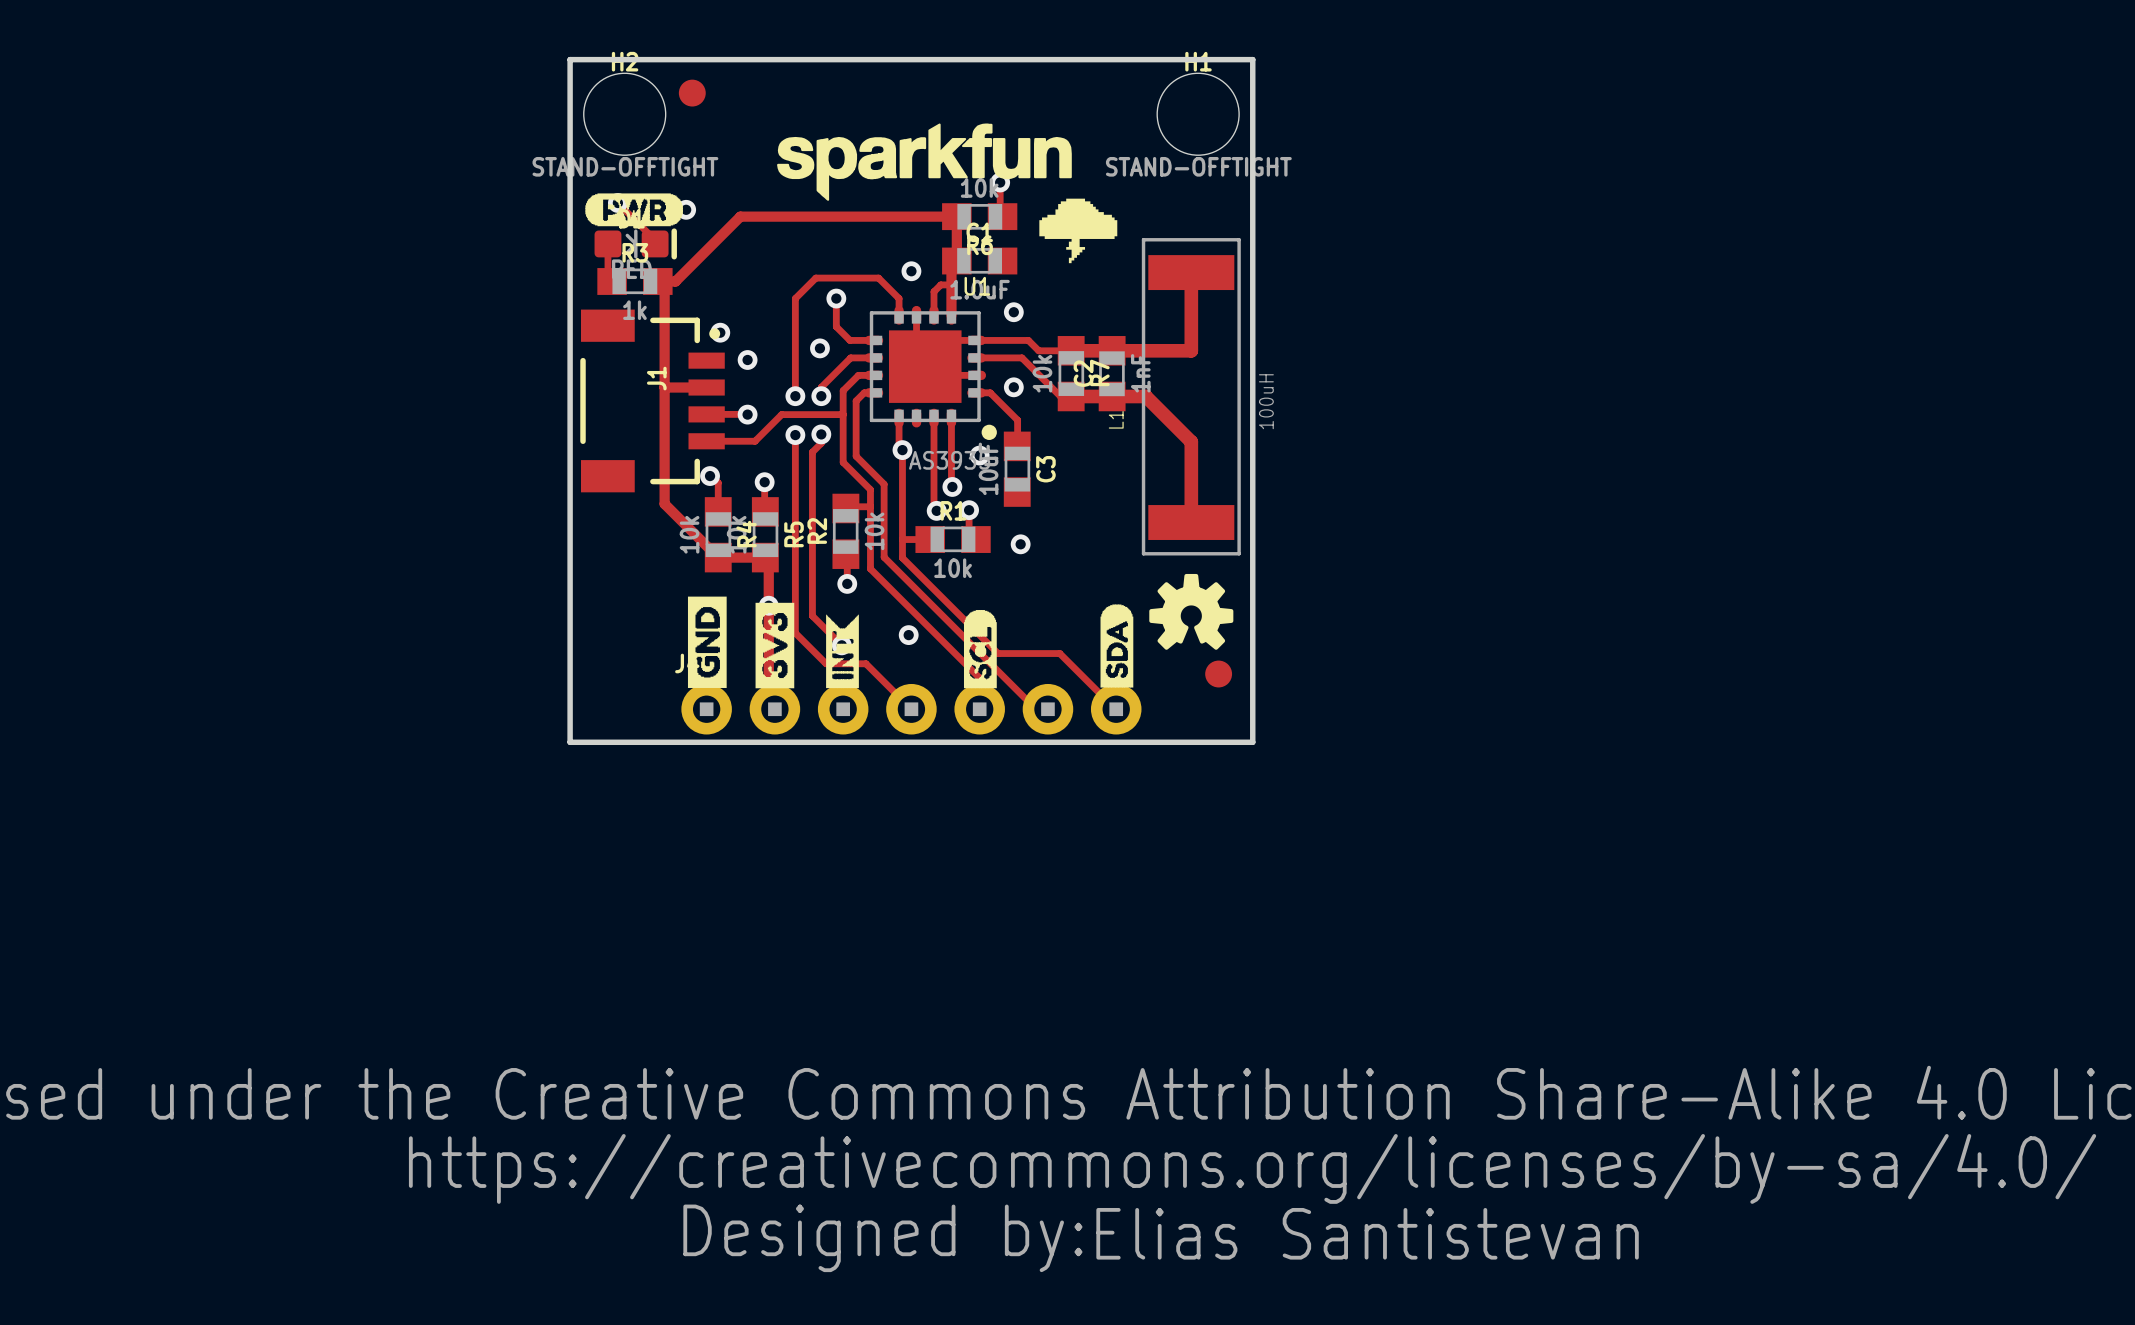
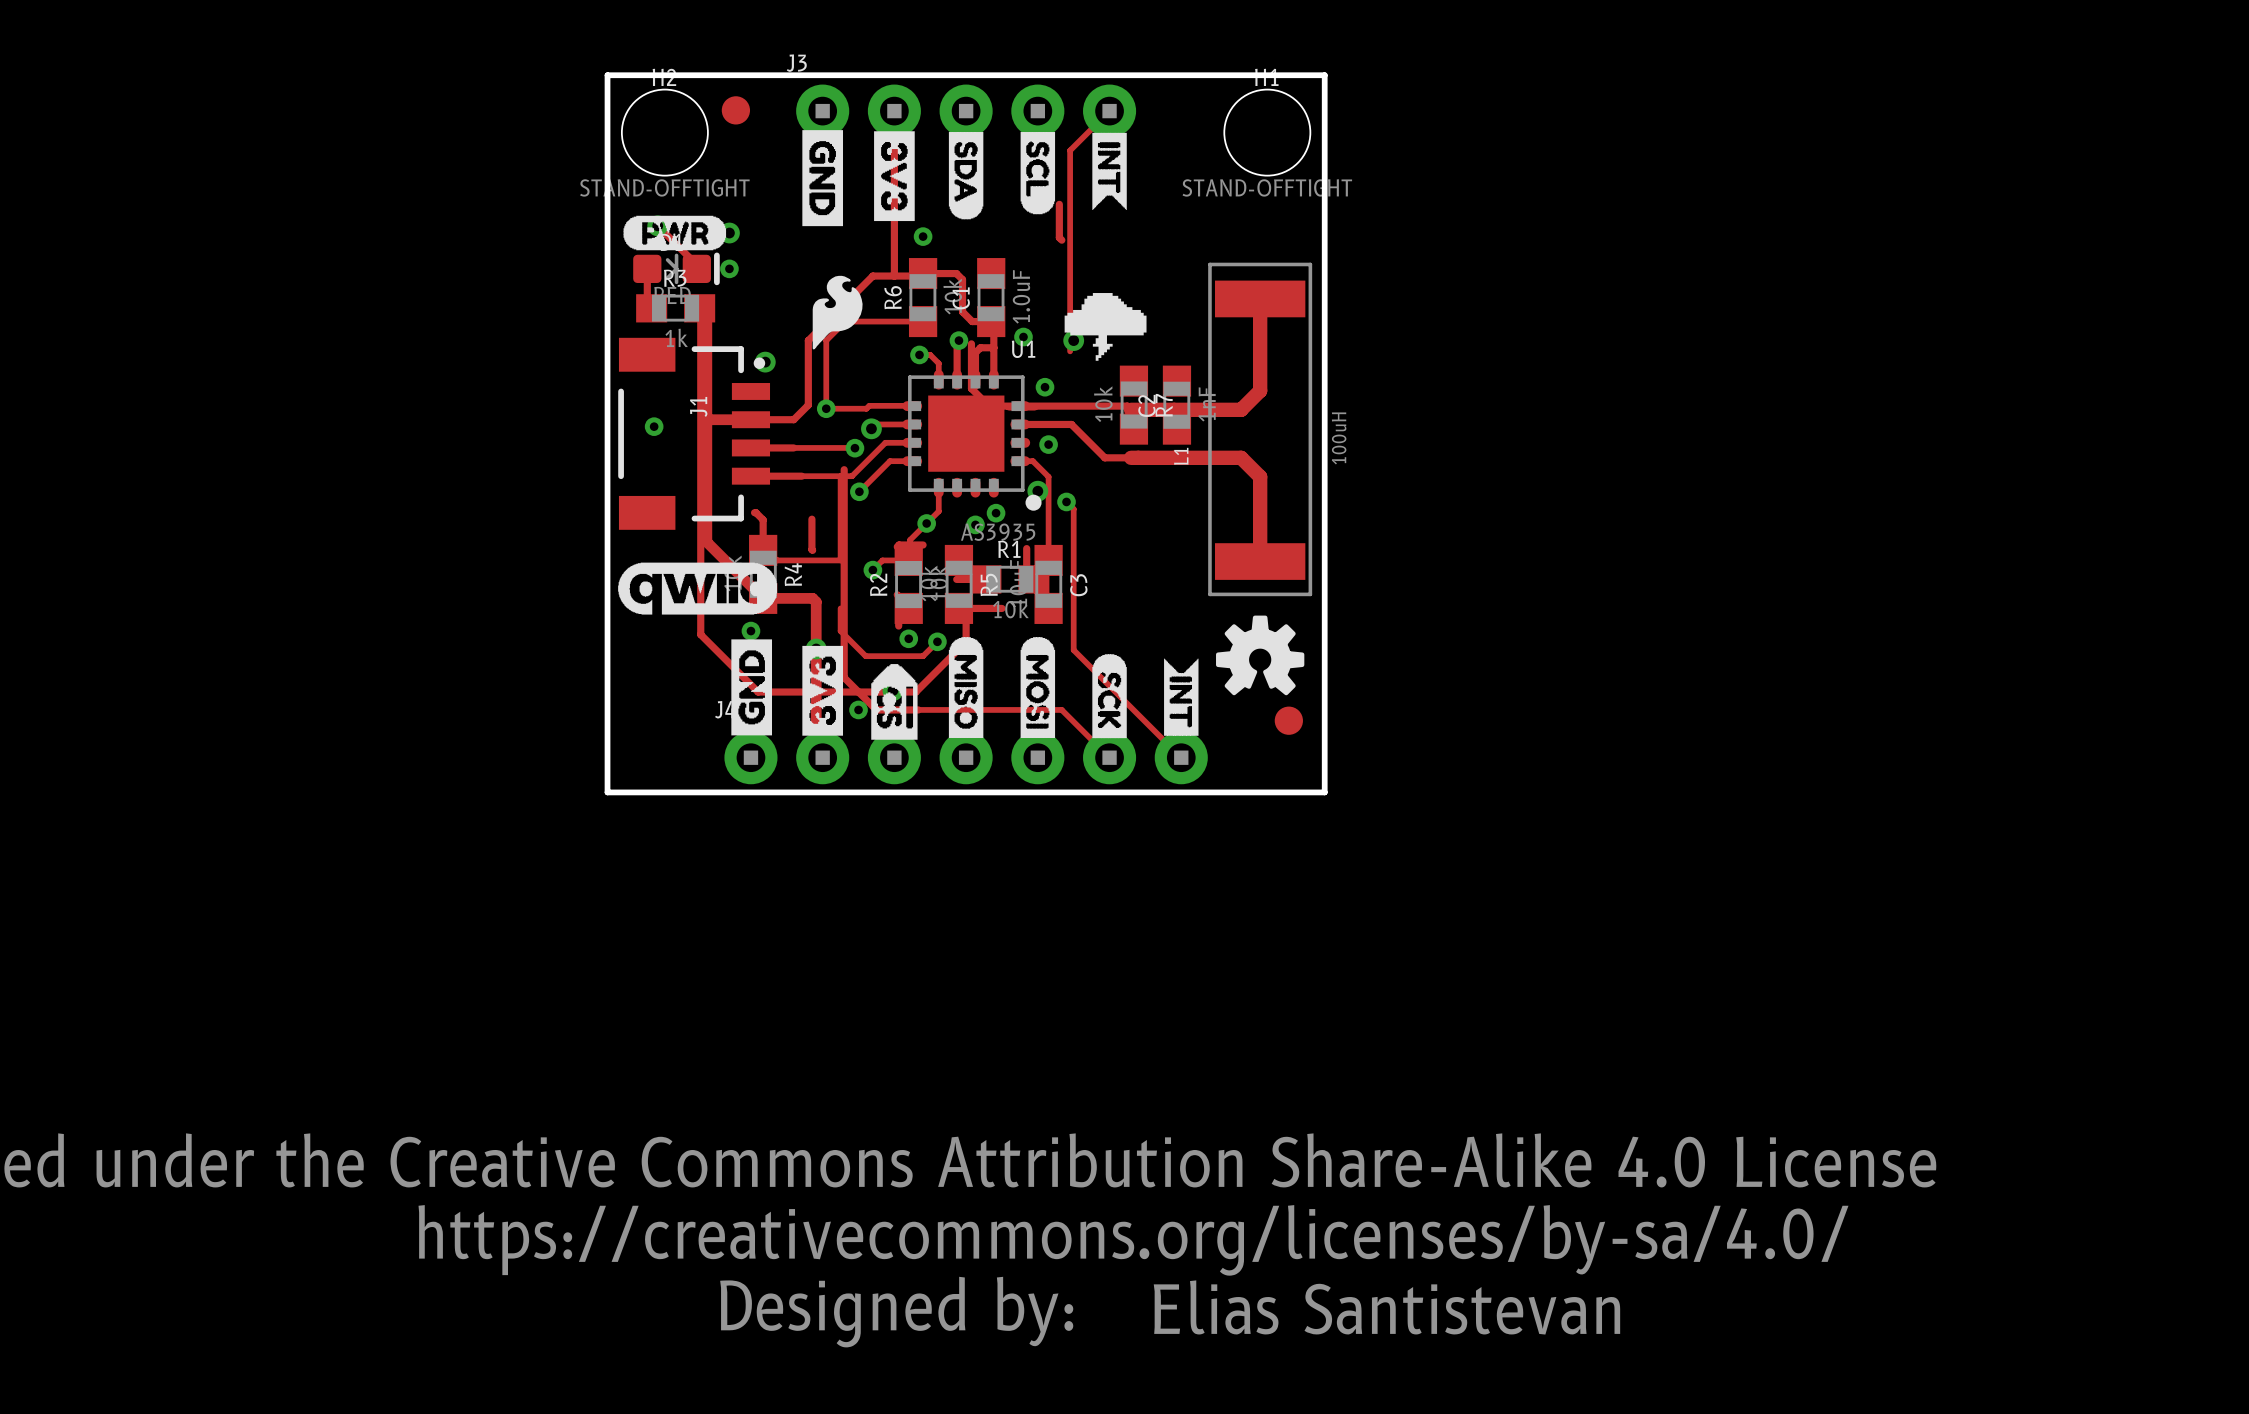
track: none -> (894, 111) (894, 276)
J3: none -> (966, 111)
track: none -> (1109, 111) (1070, 150) (1070, 351)
drawing: none -> [802, 130, 915, 227]
drawing: none -> [1020, 132, 1056, 215]
drawing: none -> [1092, 132, 1127, 210]
drawing shape: [777, 123, 1072, 201] -> [948, 132, 984, 220]
via: (1000, 182) -> none
via: none -> (923, 236)
R6 rotation: 0° (979, 216) -> 90° clockwise (923, 297)
R6 position: (979, 216) -> (923, 297)
drawing position: (1078, 230) -> (1105, 326)
via: none -> (729, 268)
drawing: none -> [812, 275, 863, 350]
C1 rotation: 0° (979, 261) -> 90° clockwise (991, 297)
C1 position: (979, 261) -> (991, 297)
via: (911, 271) -> none
track: (657, 281) (675, 281) (740, 216) (956, 216) (956, 261) (951, 266) (951, 315) -> (699, 308) (700, 634) (758, 692) (915, 692) (966, 641) (966, 615) (958, 608) (1001, 608)
track: (951, 284) (940, 284) (933, 291) (933, 315) -> none
track: none -> (923, 321) (845, 321) (826, 340) (826, 408) (911, 405)
track: (836, 298) (836, 326) (849, 340) (873, 340) -> none
via: (836, 298) -> none
via: none -> (1023, 337)
track: none -> (958, 340) (957, 342) (957, 379)
via: none -> (958, 340)
track: (899, 315) (899, 298) (878, 278) (815, 278) (795, 298) (795, 396) -> none
track: none -> (993, 347) (980, 347) (975, 352) (975, 379)
track: none -> (919, 354) (930, 354) (938, 363) (938, 379)
via: none -> (919, 354)
track: (952, 340) (1028, 340) (1038, 350) (1191, 350) -> (966, 433) (957, 424) (957, 419) (970, 406) (1127, 406) (1131, 409) (1241, 409) (1260, 390) (1260, 381)
via: (819, 348) -> none
track: none -> (993, 379) (993, 324) (991, 321) (972, 321) (962, 311) (962, 279) (956, 273) (872, 276) (808, 340) (808, 405) (793, 419) (750, 419)
via: none -> (1045, 387)
track: (873, 357) (850, 357) (821, 387) (821, 396) -> none
track: (976, 357) (1021, 357) (1060, 396) (1145, 396) (1173, 423) -> (1131, 457) (1241, 457)
via: (747, 359) -> none
U1 position: (930, 372) -> (971, 440)
track: (873, 375) (858, 375) (843, 390) (843, 462) (870, 489) (870, 568) (979, 678) (979, 709) -> none
via: none -> (826, 408)
via: (1013, 387) -> none
track: none -> (876, 423) (912, 424)
track: (873, 392) (864, 392) (856, 400) (856, 456) (884, 484) (884, 557) (1036, 709) (1047, 709) -> none
track: none -> (1020, 424) (1071, 424) (1104, 457) (1138, 457)
track: (976, 392) (990, 392) (1017, 420) (1017, 446) -> none
via: none -> (654, 426)
via position: (795, 396) -> (854, 448)
via: none -> (1048, 444)
track: none -> (793, 447) (854, 447)
via: (747, 414) -> none
track: (843, 414) (781, 414) (755, 441) -> (912, 442) (885, 442) (852, 476) (801, 476)
track: (899, 418) (899, 446) (902, 450) (902, 557) (998, 653) (1059, 653) (1116, 709) -> (1066, 501) (1073, 509) (1073, 650) (1181, 757)
track: (933, 418) (933, 513) (936, 510) -> none
track: (951, 418) (952, 486) -> none
track: none -> (912, 461) (890, 461) (859, 491)
track: none -> (1020, 461) (1032, 461) (1048, 476) (1048, 560)
track: (821, 434) (821, 443) (812, 452) (812, 615) (841, 645) -> none
via: (821, 434) -> none
via: (795, 435) -> none
track: none -> (840, 476) (840, 560) (776, 559)
via: (902, 450) -> none
track: none -> (938, 487) (938, 511) (910, 540) (910, 559) (882, 560) (872, 570)
via: none -> (859, 491)
via: none -> (1066, 501)
C3 position: (1017, 469) -> (1048, 584)
via: (710, 476) -> none
via: (764, 482) -> none
via: none -> (926, 523)
via position: (952, 486) -> (996, 513)
via: none -> (975, 524)
via: (936, 510) -> none
via: (969, 510) -> none
drawing: none -> [618, 562, 778, 615]
via: none -> (872, 570)
R2 position: (845, 531) -> (908, 584)
R5 position: (765, 534) -> (958, 584)
via: (1020, 544) -> none
track: none -> (840, 608) (840, 631) (865, 656) (923, 656) (937, 641)
via position: (847, 583) -> (908, 638)
via: none -> (750, 631)
drawing: none -> [948, 637, 984, 738]
via: none -> (937, 641)
drawing shape: [1100, 604, 1134, 688] -> [1164, 658, 1199, 736]
drawing shape: [963, 610, 997, 689] -> [1020, 637, 1056, 738]
drawing: none -> [1092, 654, 1127, 739]
drawing shape: [826, 614, 859, 689] -> [871, 664, 918, 740]
via: (908, 635) -> none
via: none -> (858, 709)
track: (865, 663) (911, 709) -> (918, 709) (1061, 709) (1109, 757)

